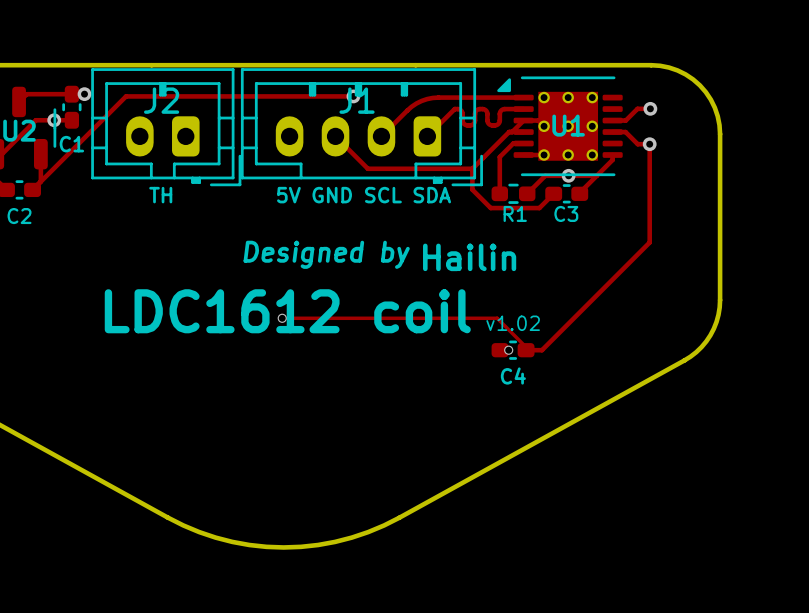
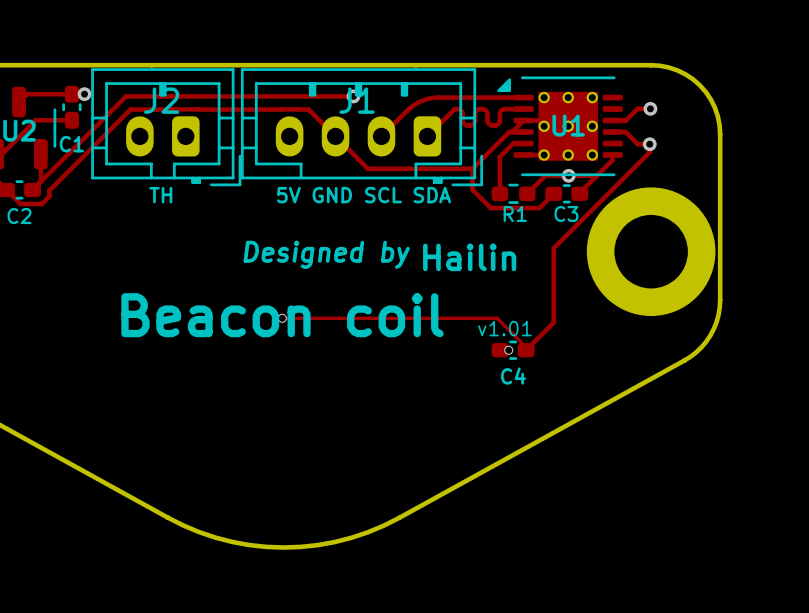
track: none -> (172, 109) (199, 109)
track: none -> (172, 109) (130, 109) (49, 190) (49, 196) (41, 203) (20, 203) (6, 189)
track: none -> (199, 109) (280, 109)
track: none -> (281, 109) (298, 109)
track: none -> (298, 109) (308, 109) (335, 136)
via: (54, 120) -> none
track: (649, 152) (649, 242) (541, 350) (526, 350) -> (649, 152) (553, 248) (553, 322) (526, 350)
part: none -> (651, 251)
text: LDC1612 coil (287, 311) -> Beacon coil (282, 315)
text: v1.02 (513, 323) -> v1.01 (504, 328)

